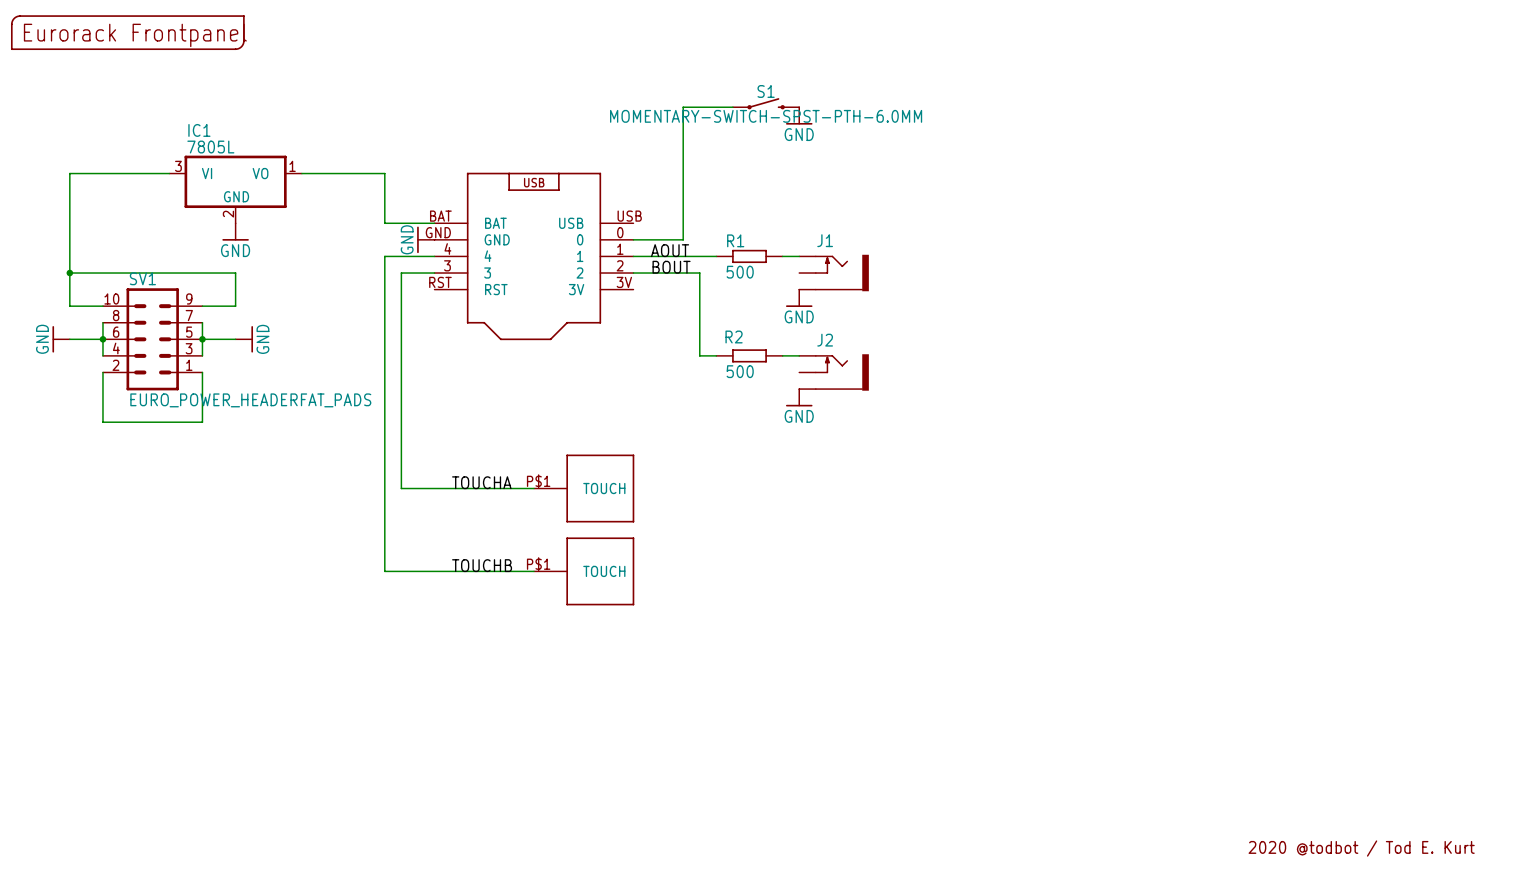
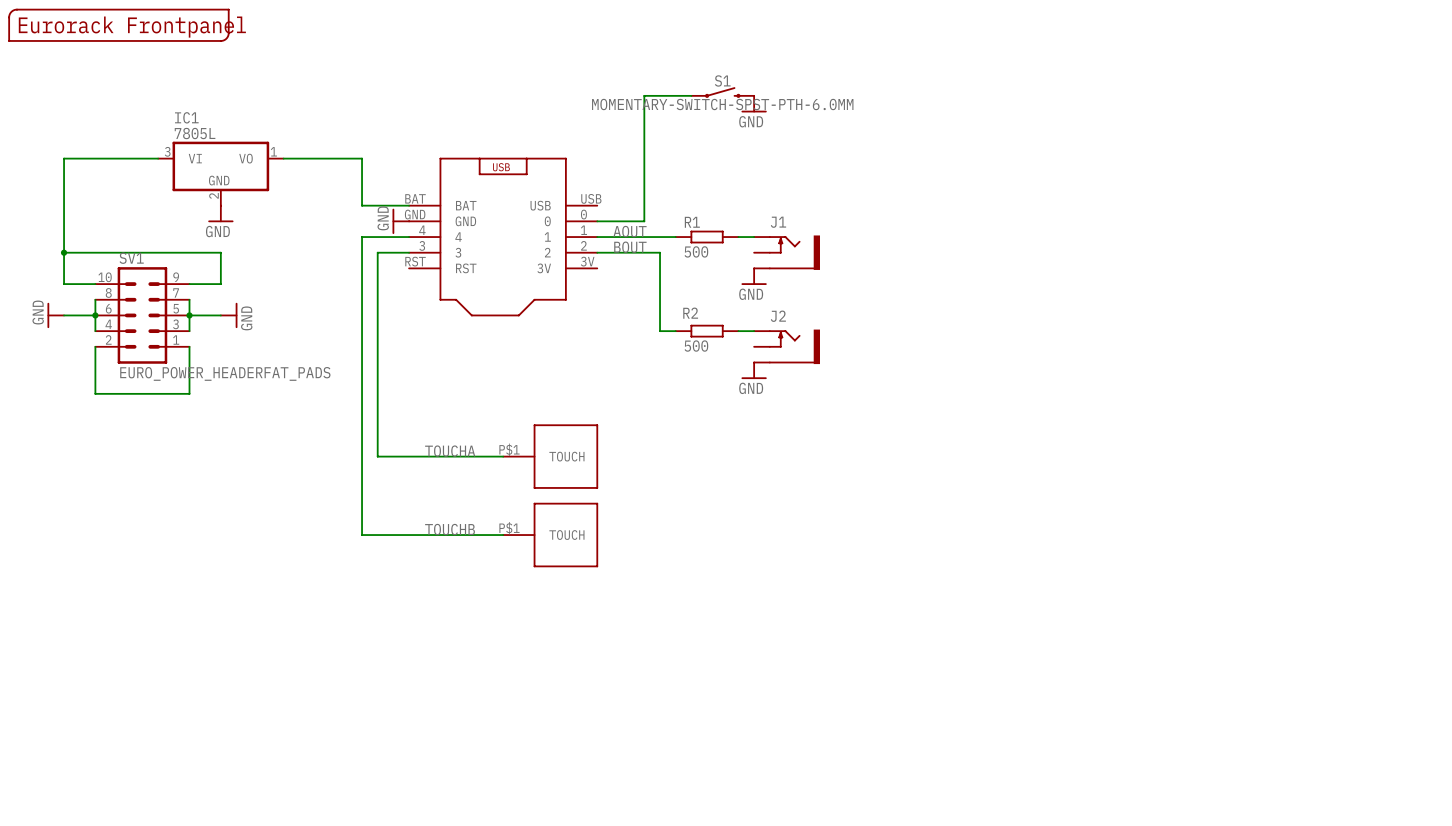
text: 2020 @todbot / Tod E. Kurt (1361, 848) -> none

